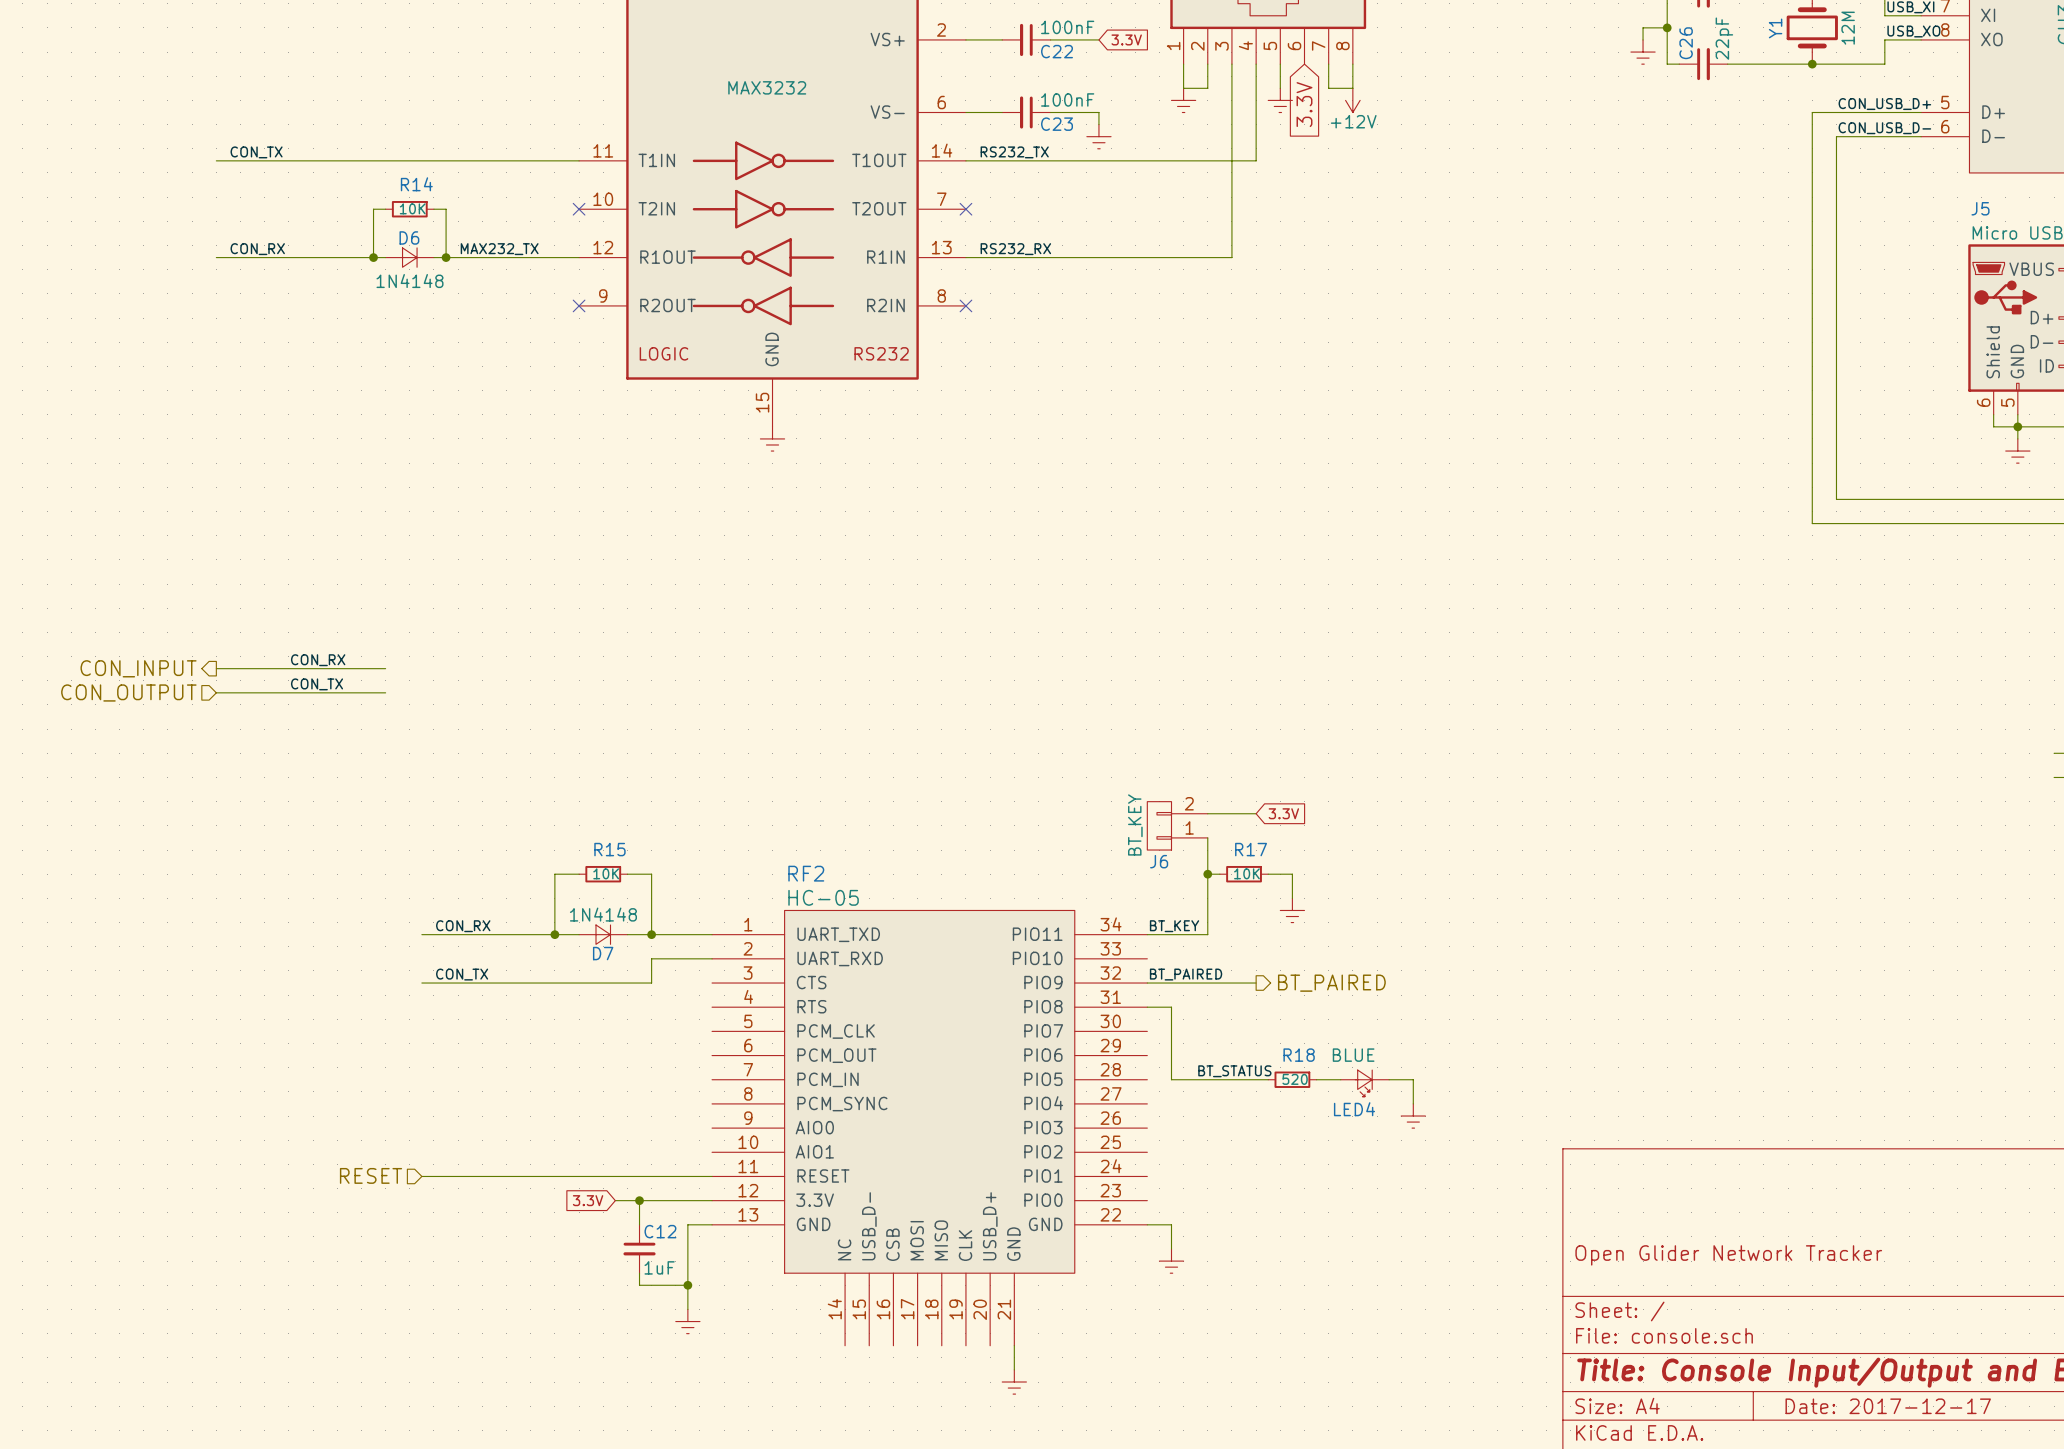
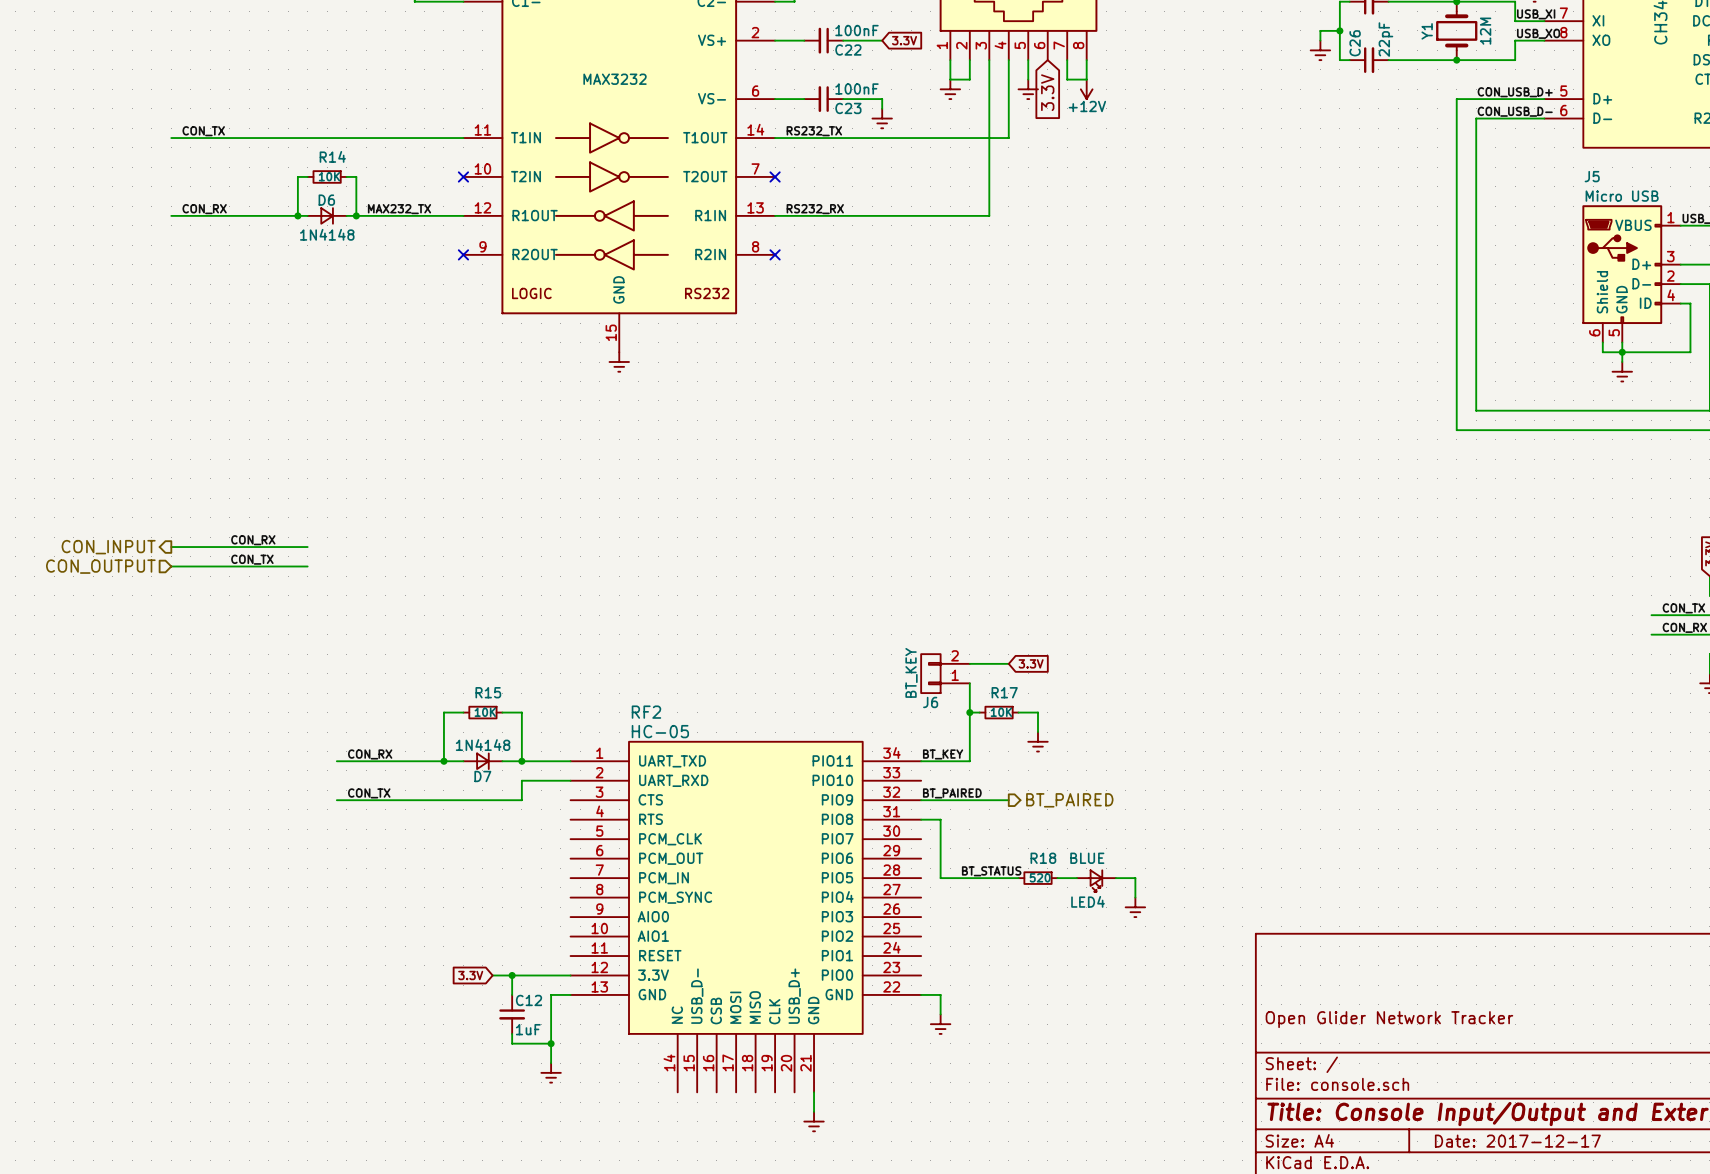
hierarchical label: RESET (371, 1175) -> none
wire: (421, 1176) (712, 1176) -> none

